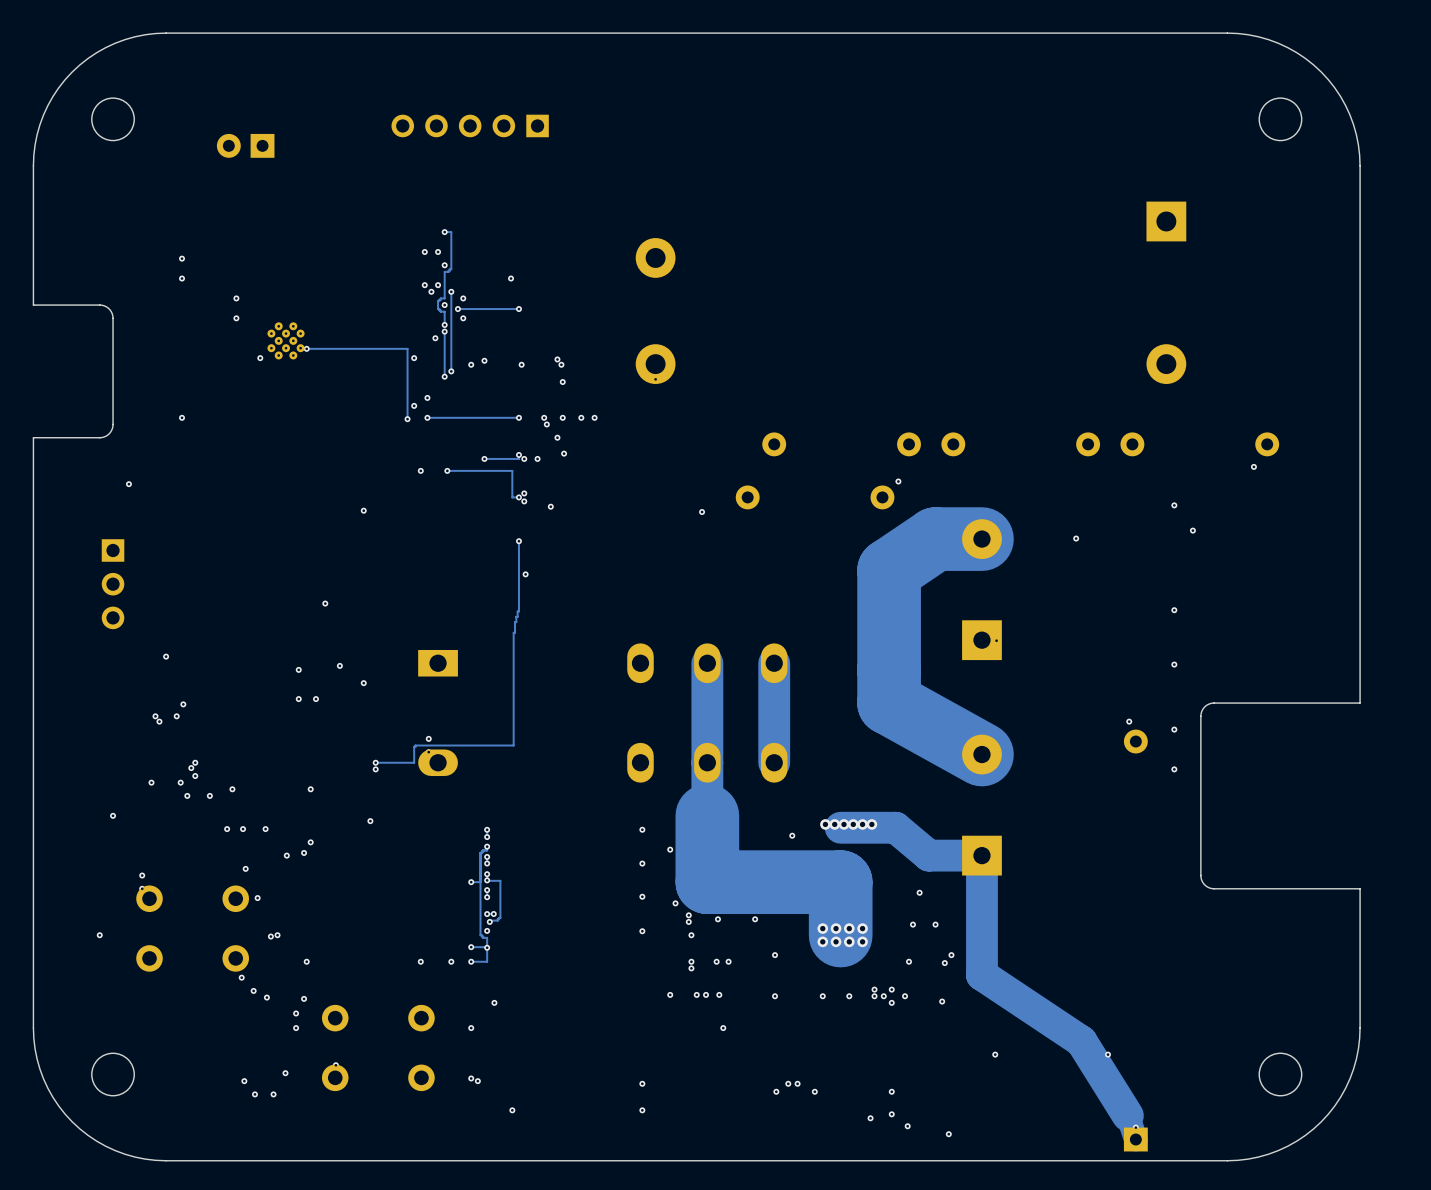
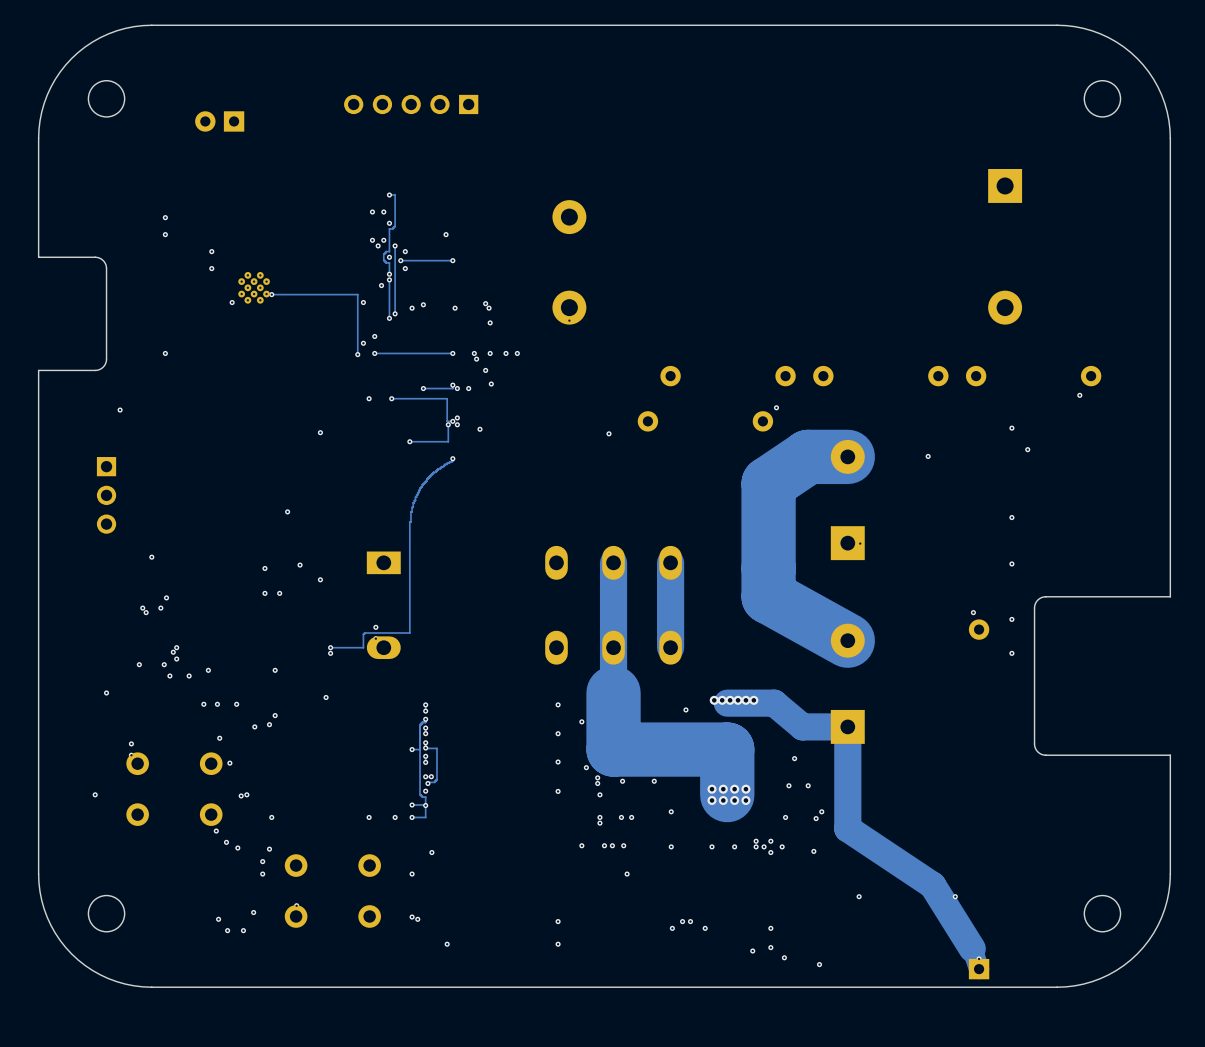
track: none -> (448, 424) (448, 441) (409, 441)
via: none -> (448, 424)
via: none -> (409, 441)
track: (518, 543) (518, 611) (513, 632) (513, 745) (468, 745) -> (452, 460) (438, 468) (426, 479) (413, 502) (409, 522) (409, 632)
via: (525, 574) -> none

